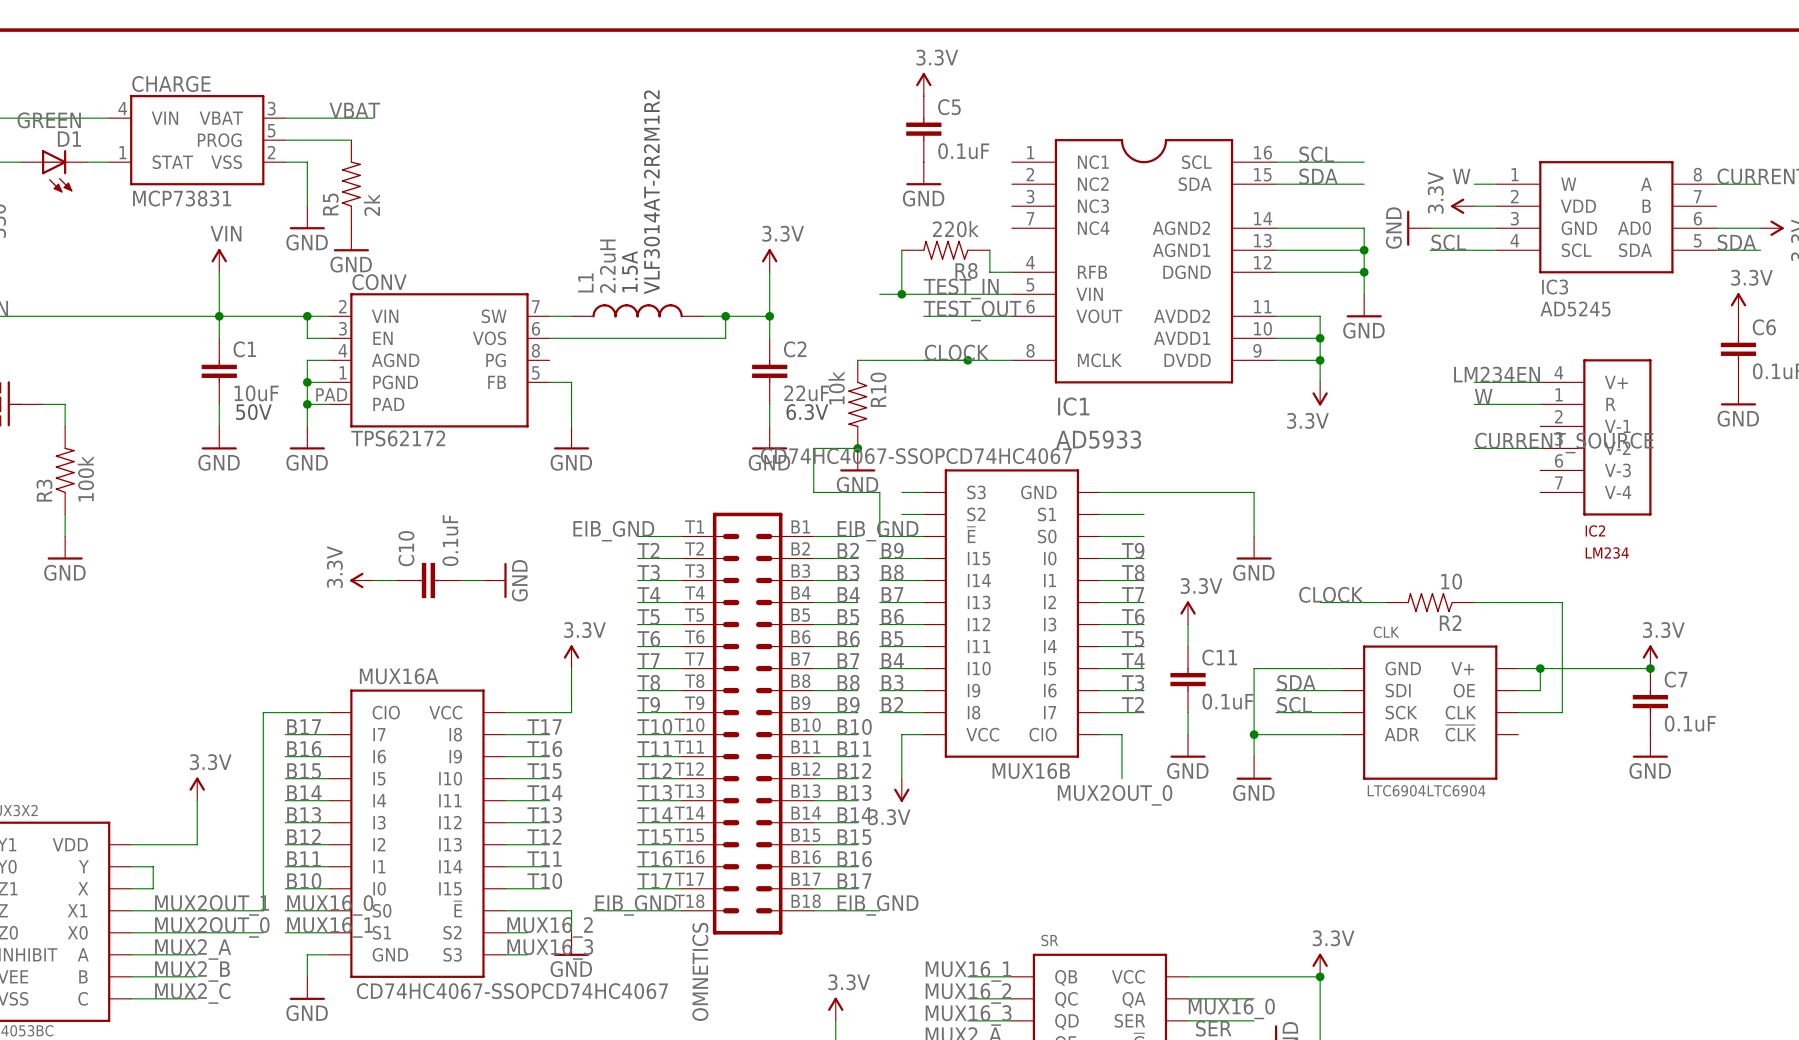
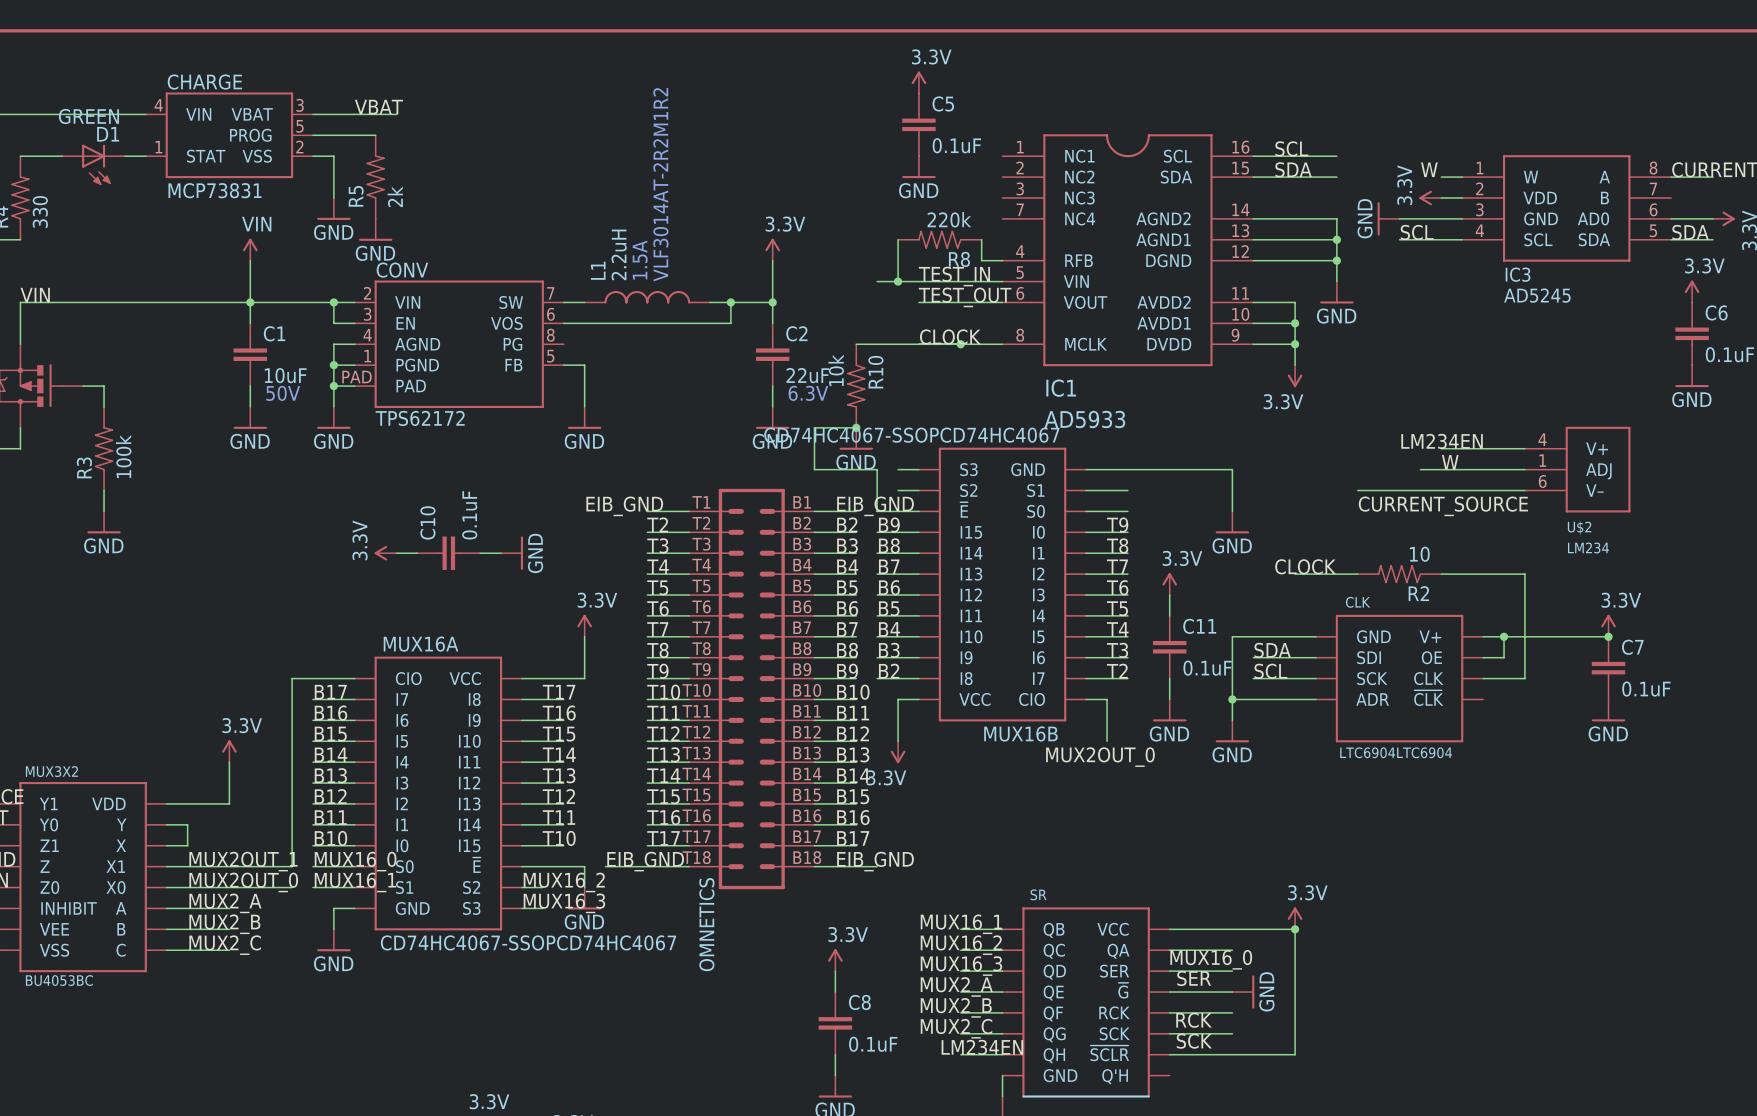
label position: LM234EN (1497, 374) -> LM234EN (1442, 441)
wire: (1474, 382) (1540, 382) -> none
label position: W (1483, 396) -> W (1450, 462)
wire: (1474, 404) (1540, 404) -> none
IC2: LM234 (1595, 437) -> none
label position: CURRENT_SOURCE (1564, 443) -> CURRENT_SOURCE (1443, 506)
wire: (1474, 448) (1540, 448) -> none
wire: none -> (1441, 448) (1524, 448)
wire: none -> (1420, 469) (1524, 469)
U$2: none -> LM234 (1577, 469)
wire: none -> (1357, 490) (1524, 490)

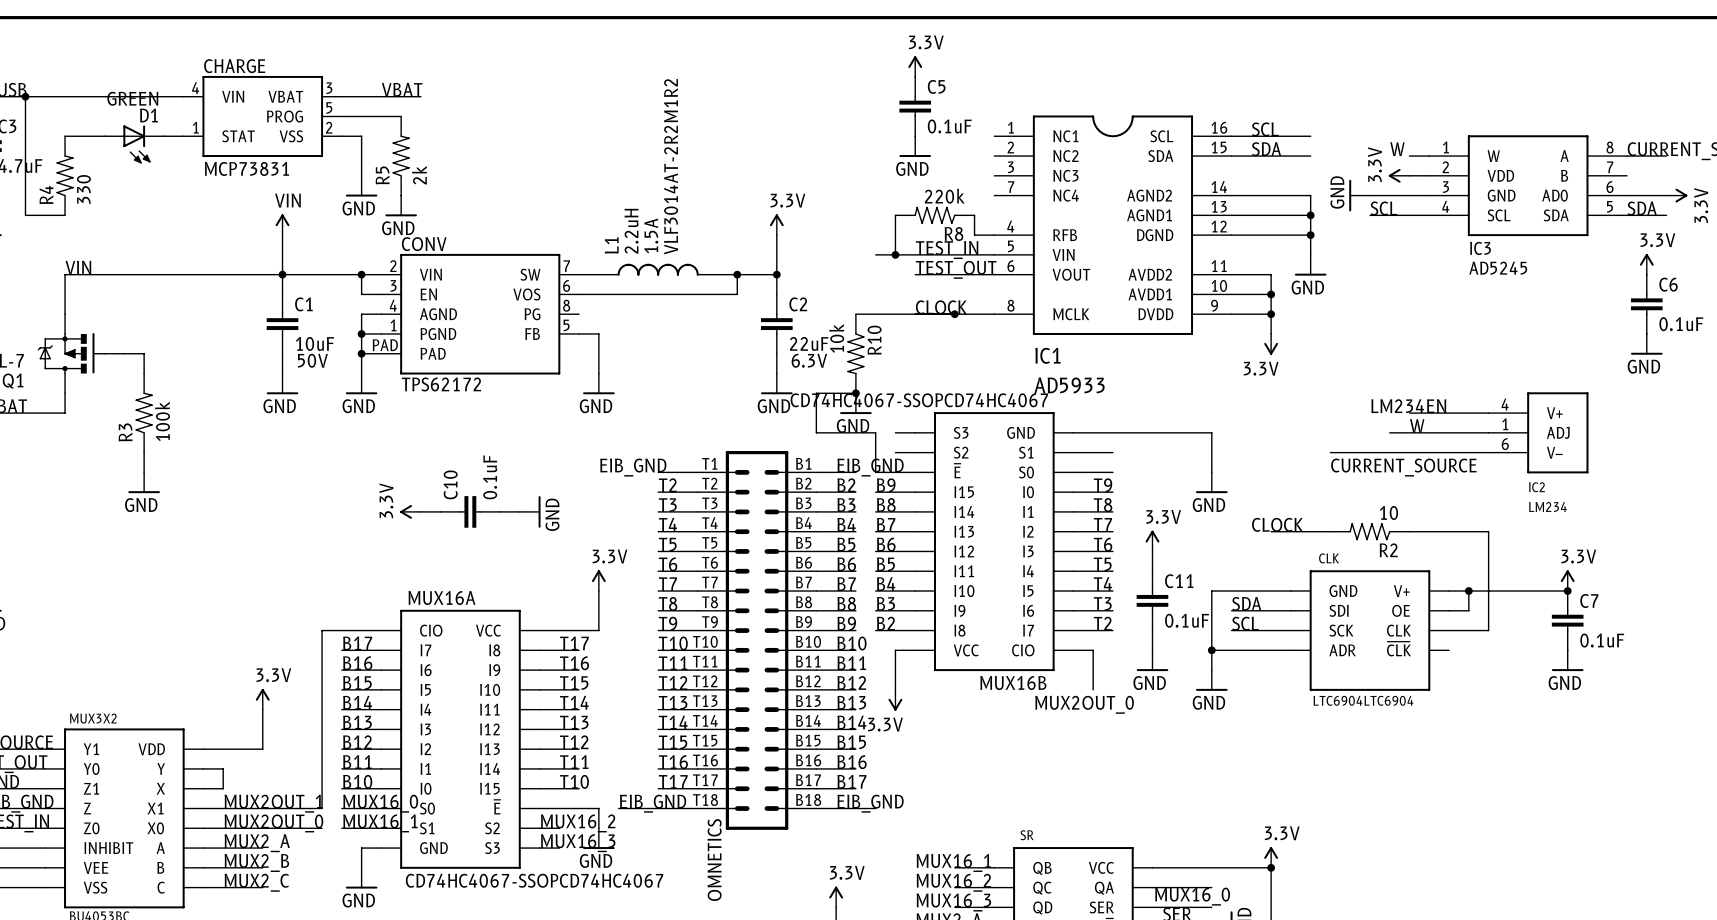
U$2 name: U$2 (1579, 527) -> IC2 (1536, 487)

